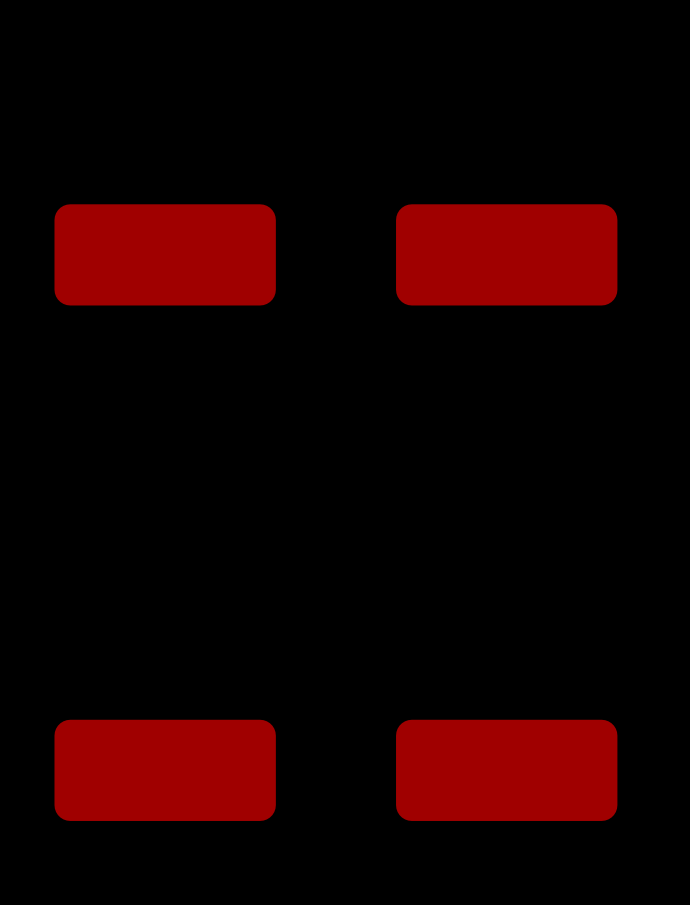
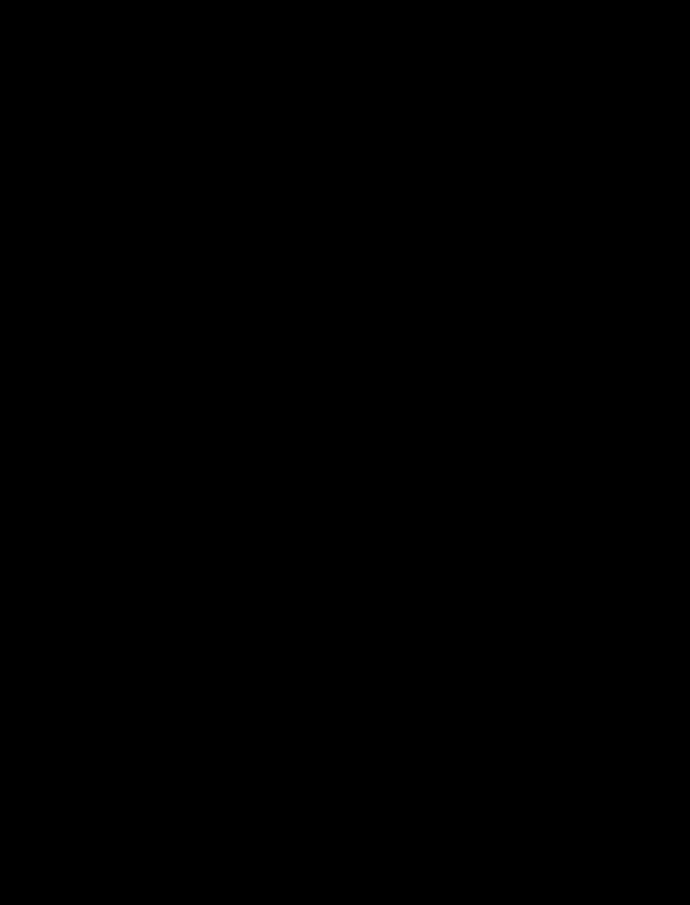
part: (335, 254) -> none
part: (335, 770) -> none

